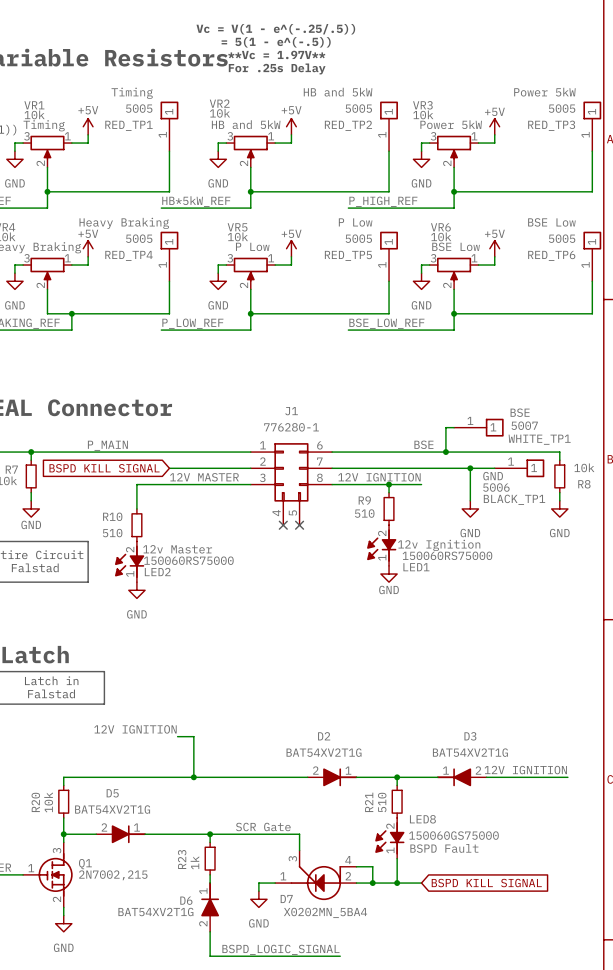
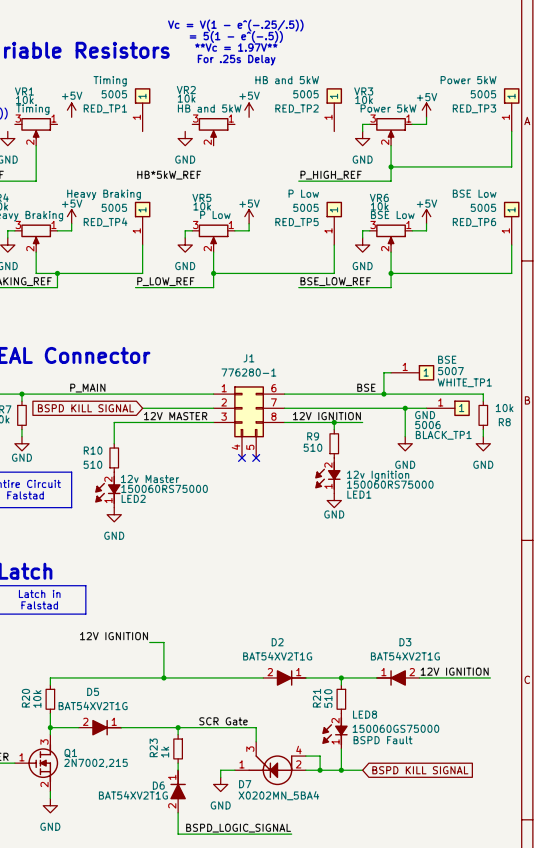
wire: (88, 134) (88, 143) (71, 143) -> none
wire: (291, 134) (291, 143) (275, 143) -> none
wire: (23, 143) (14, 143) (14, 151) -> none
wire: (226, 143) (218, 143) (218, 151) -> none
wire: (169, 151) (169, 191) (47, 191) -> none
wire: (389, 151) (389, 191) (250, 191) -> none
wire: (250, 167) (250, 208) (161, 208) -> none
junction: (47, 191) -> none
junction: (250, 191) -> none

